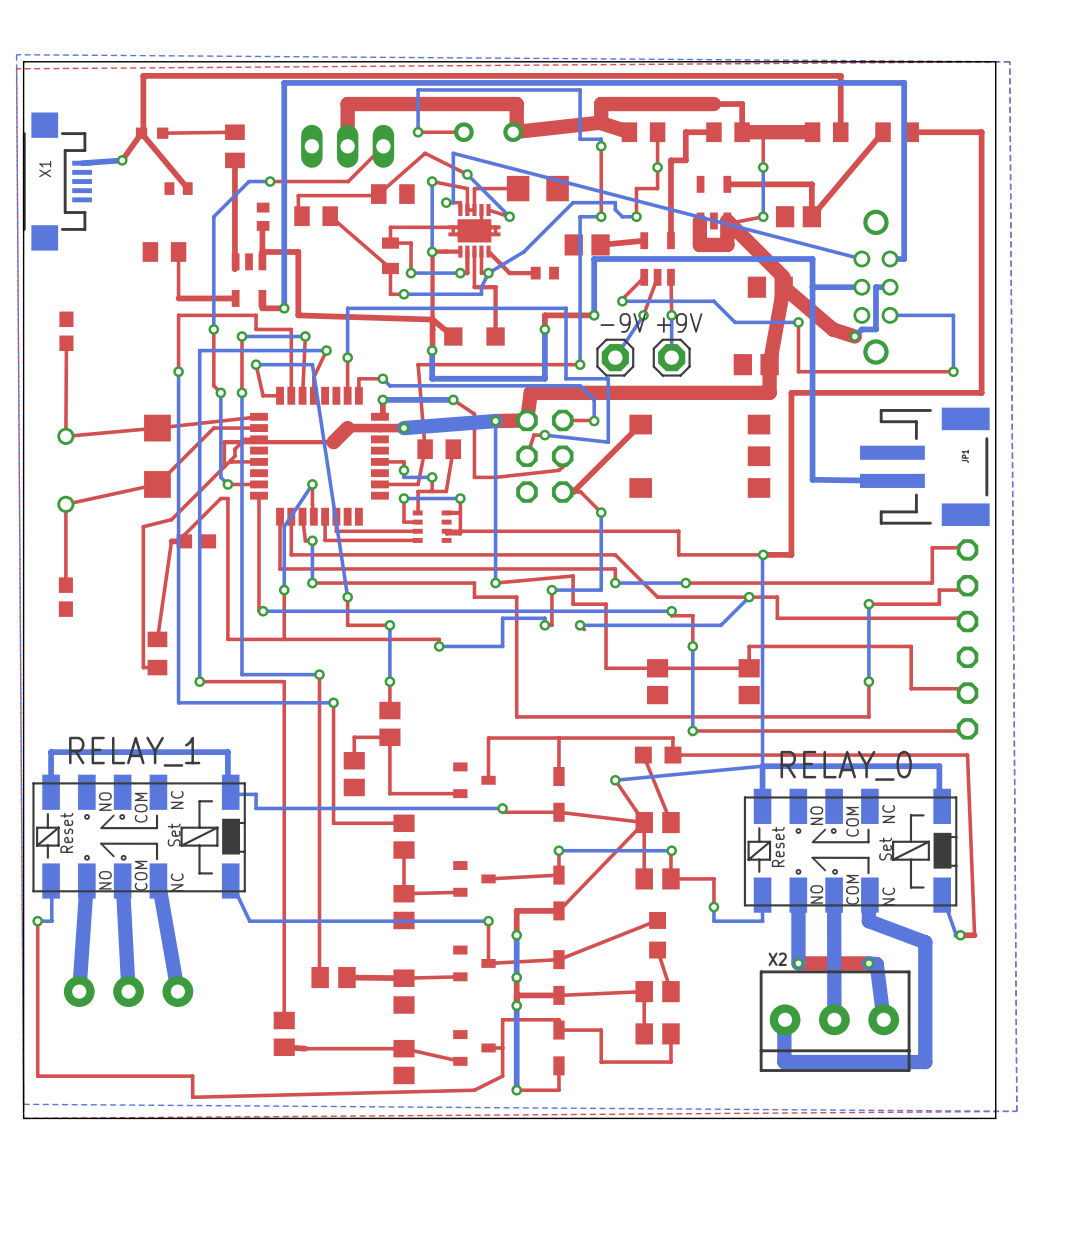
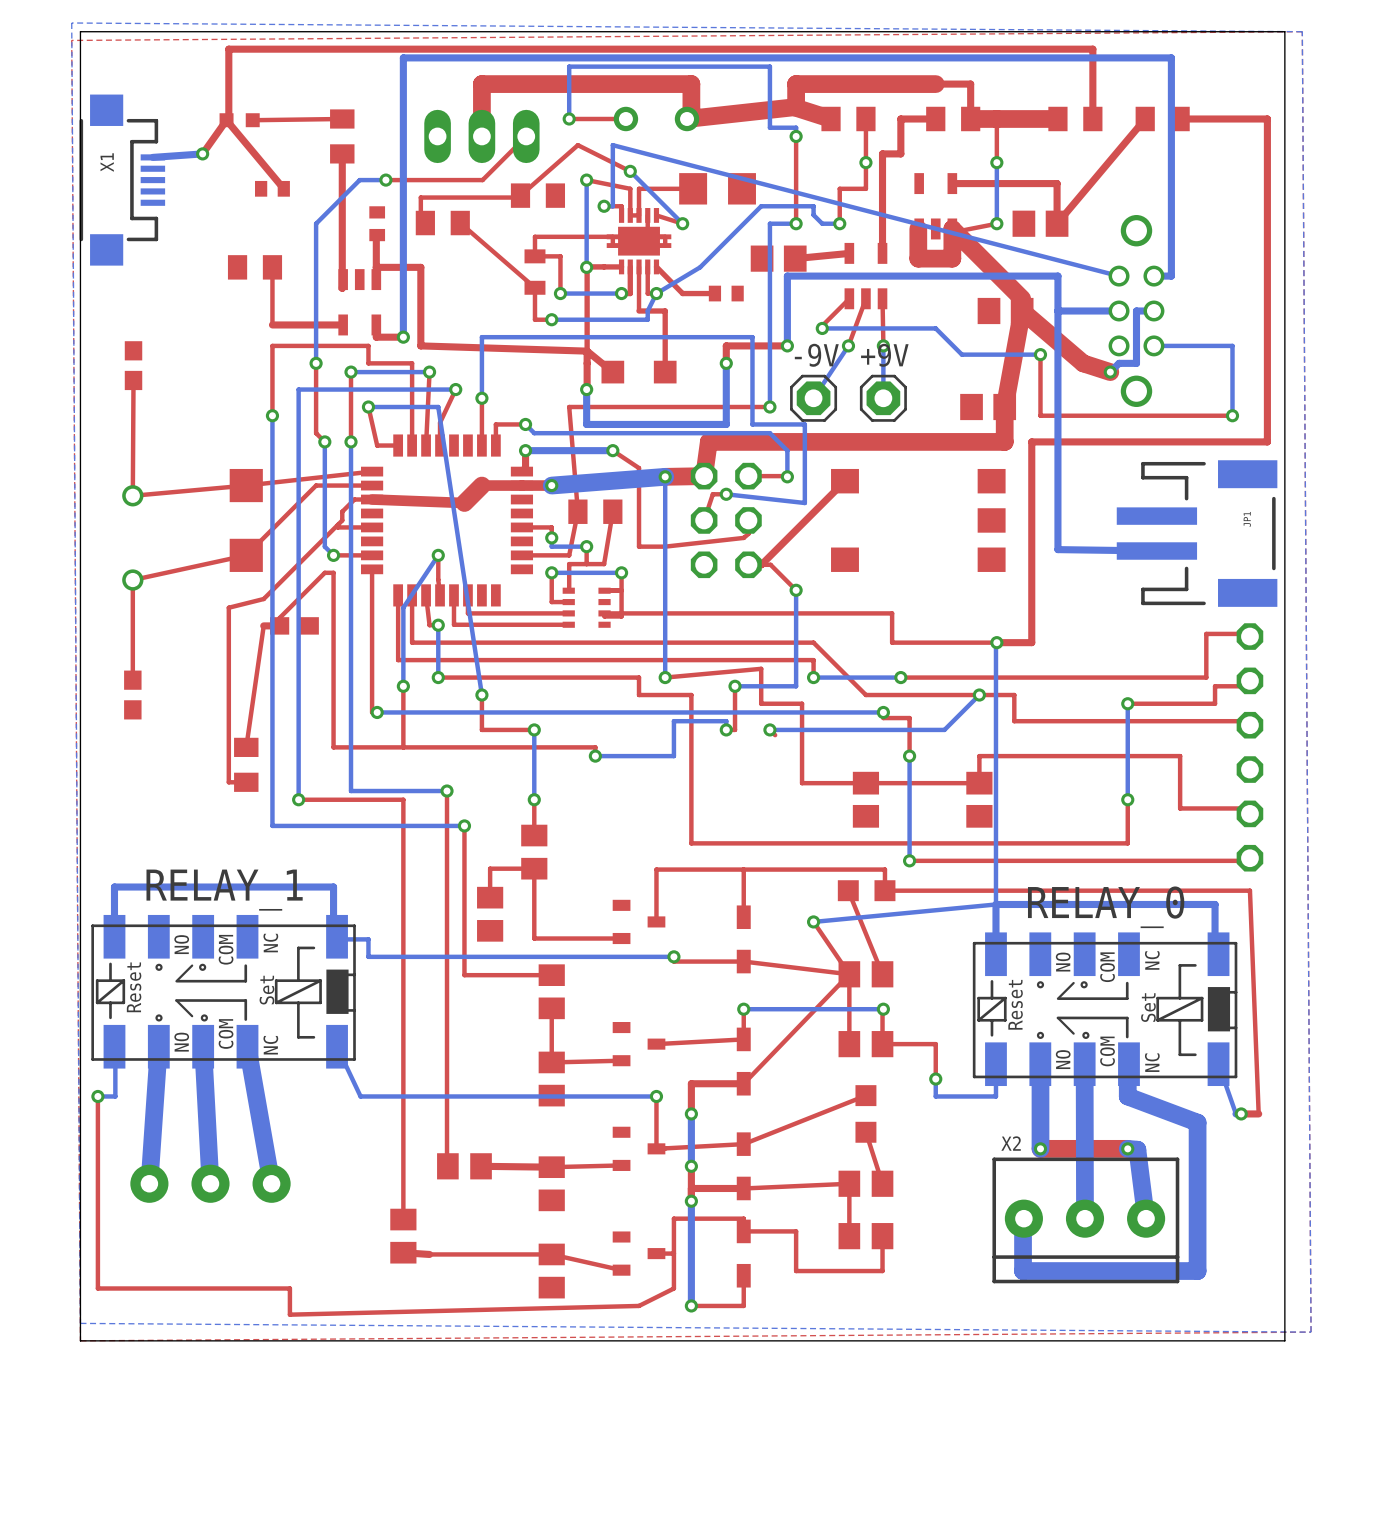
top track: (333, 442) (224, 442) (224, 466) -> (464, 503) (372, 499)

